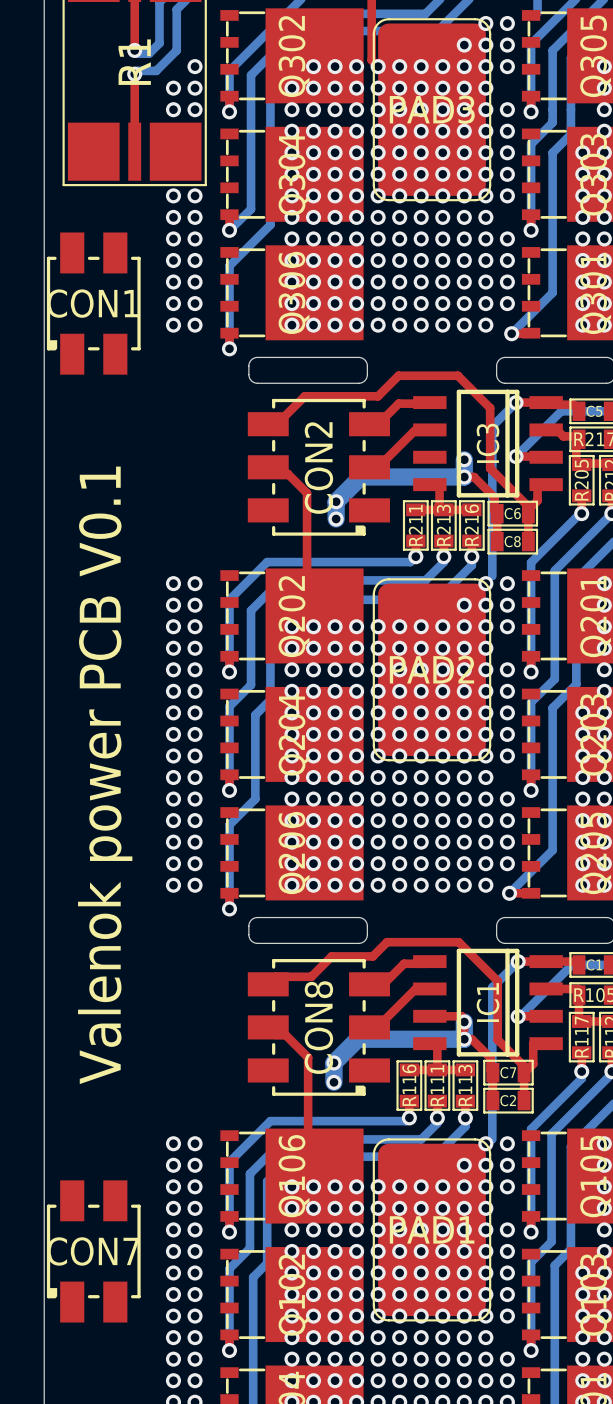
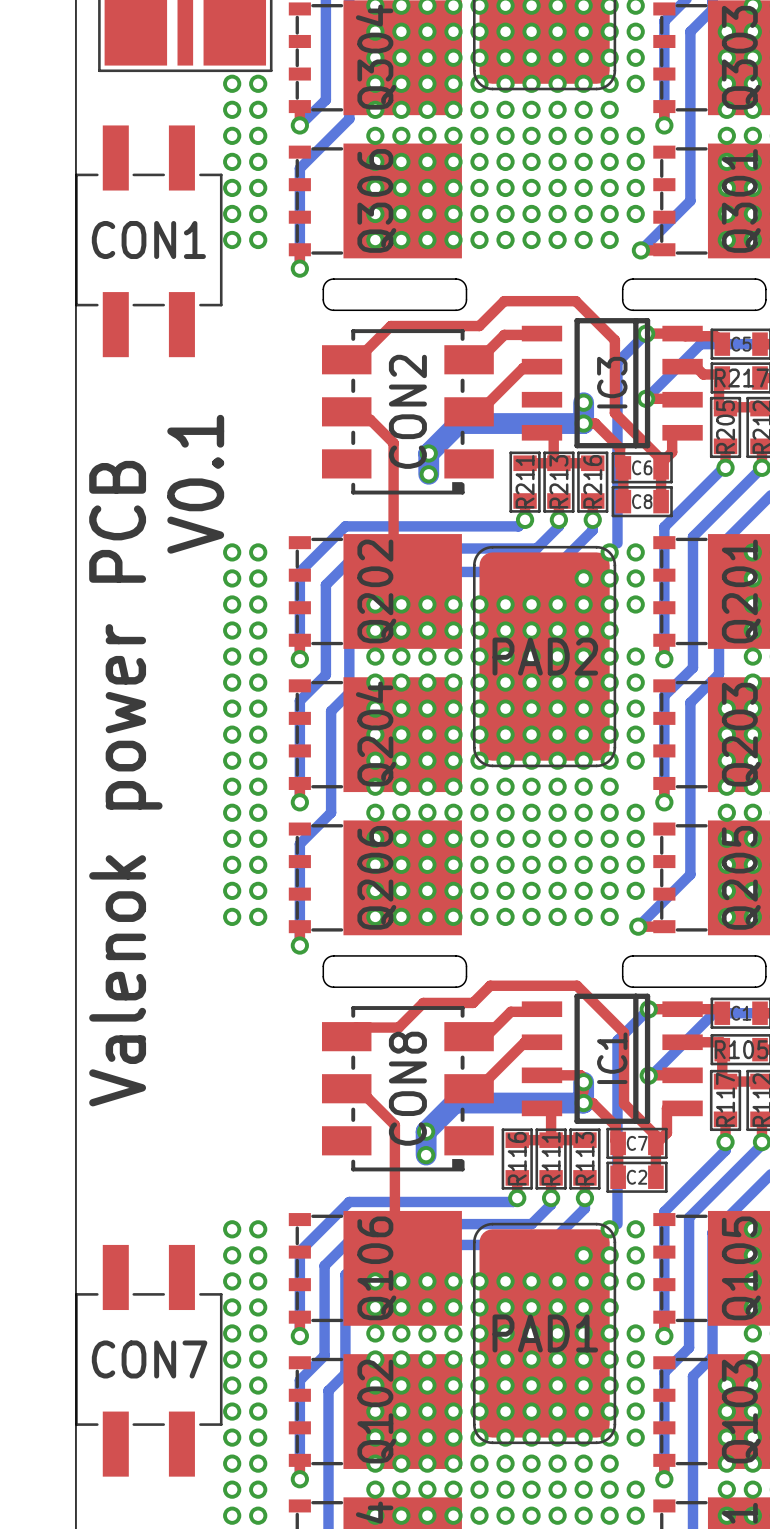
CON1 footprint: [46, 232, 141, 375] -> [75, 125, 223, 358]
text: none -> V0.1 (195, 484)
text: Valenok power PCB V0.1 (105, 775) -> Valenok power PCB (125, 783)
CON7 footprint: [46, 1180, 141, 1323] -> [75, 1244, 223, 1477]

